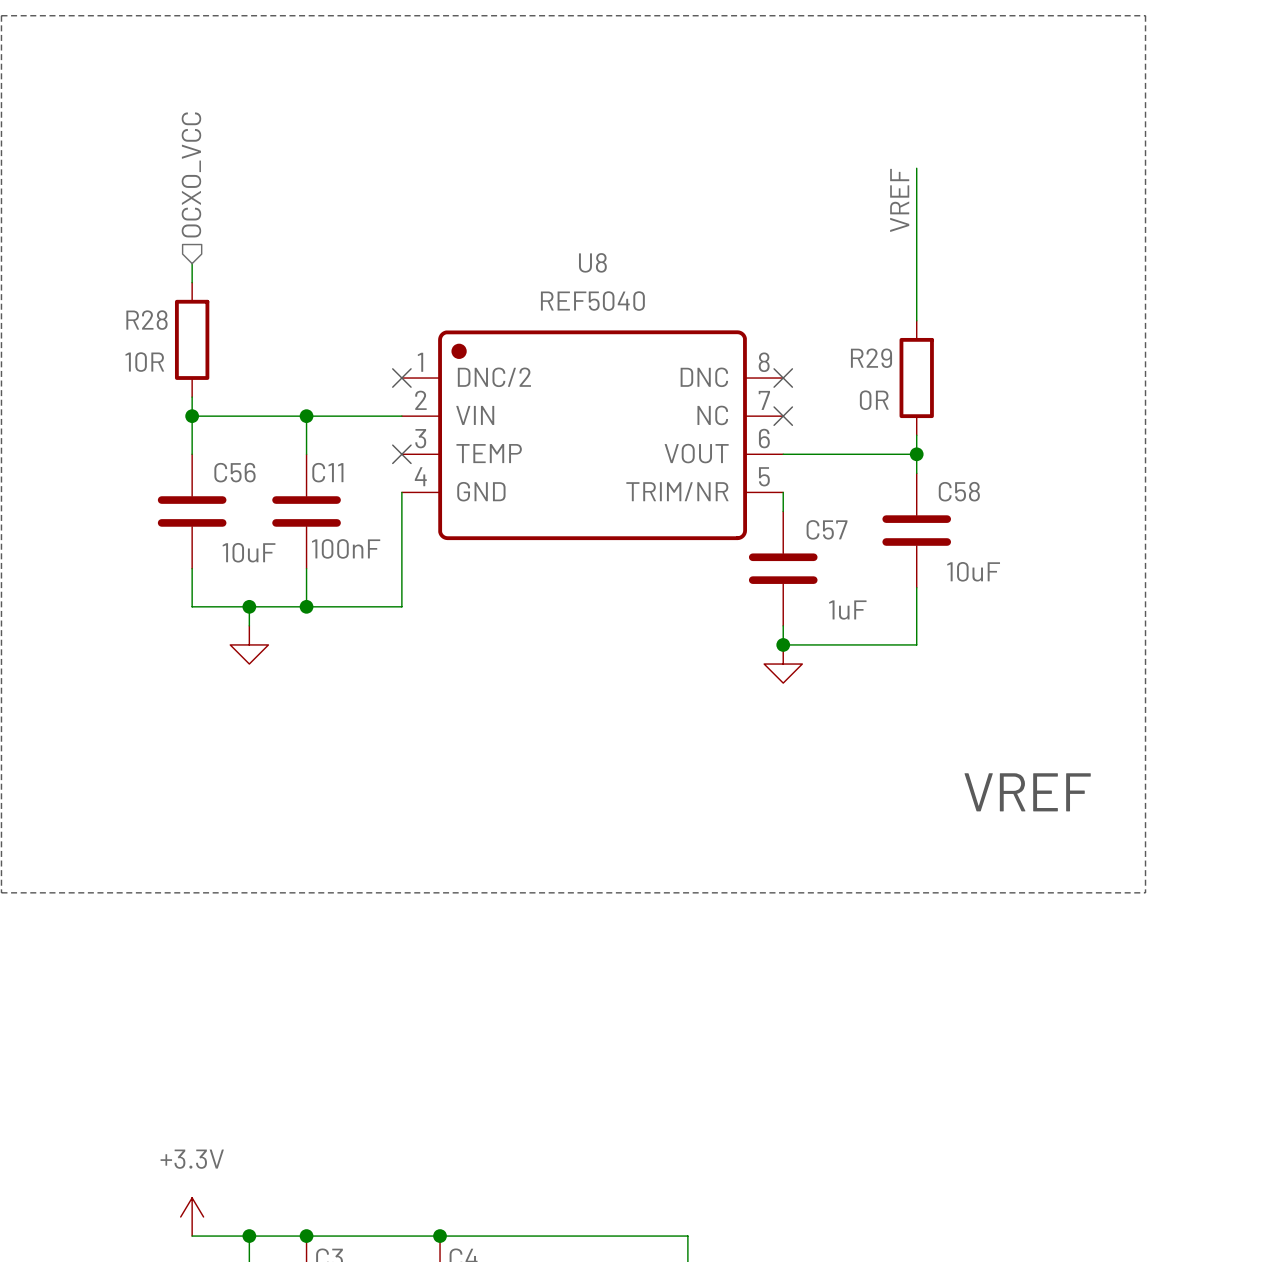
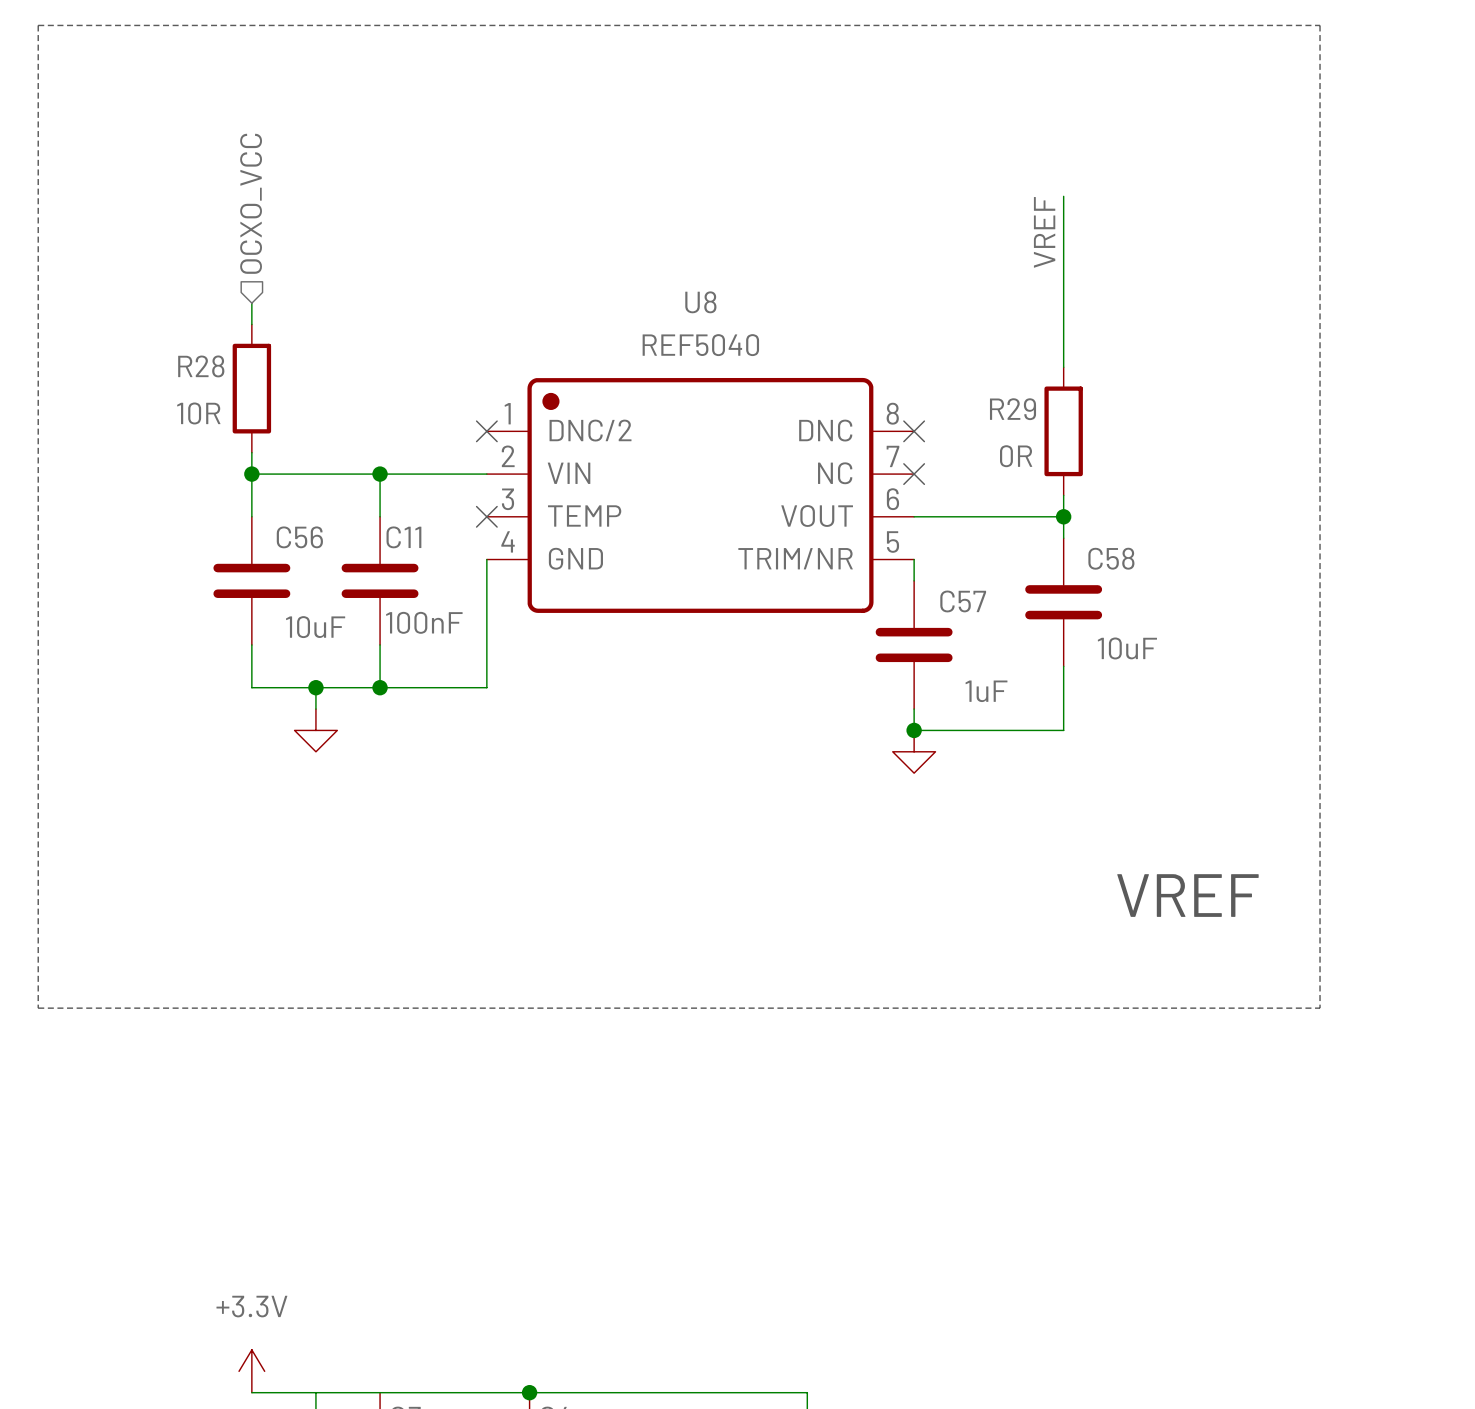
junction: (249, 1236) -> none
junction: (306, 1236) -> none

